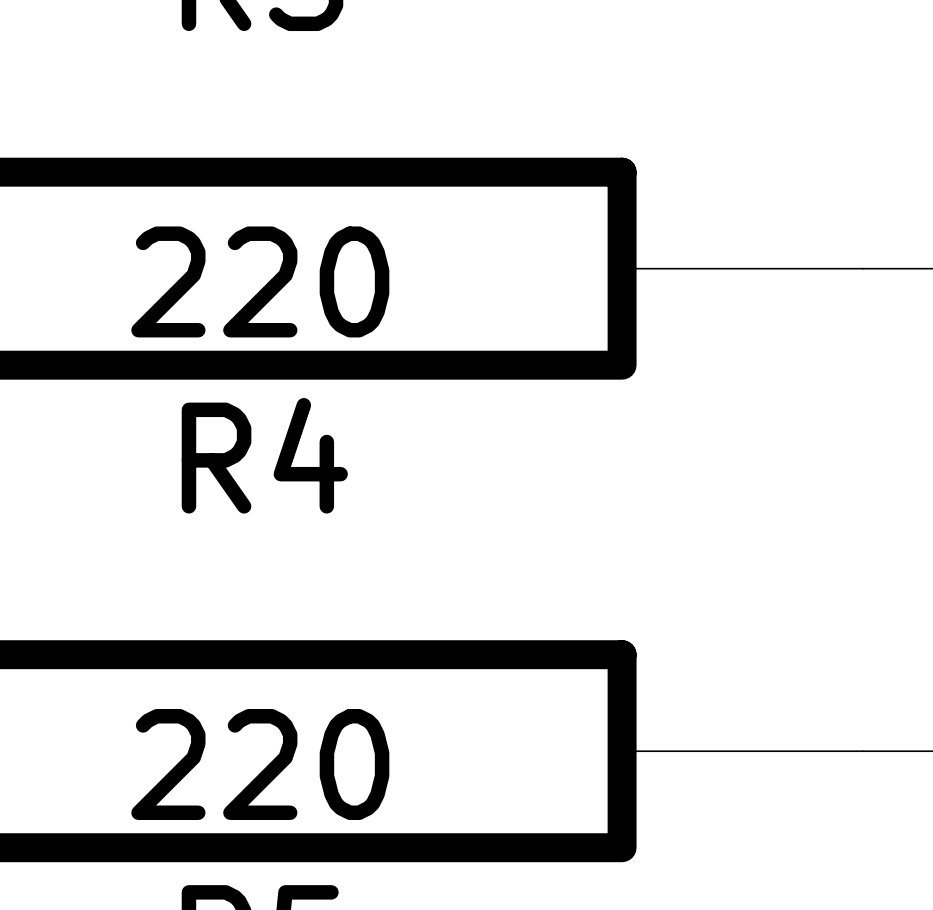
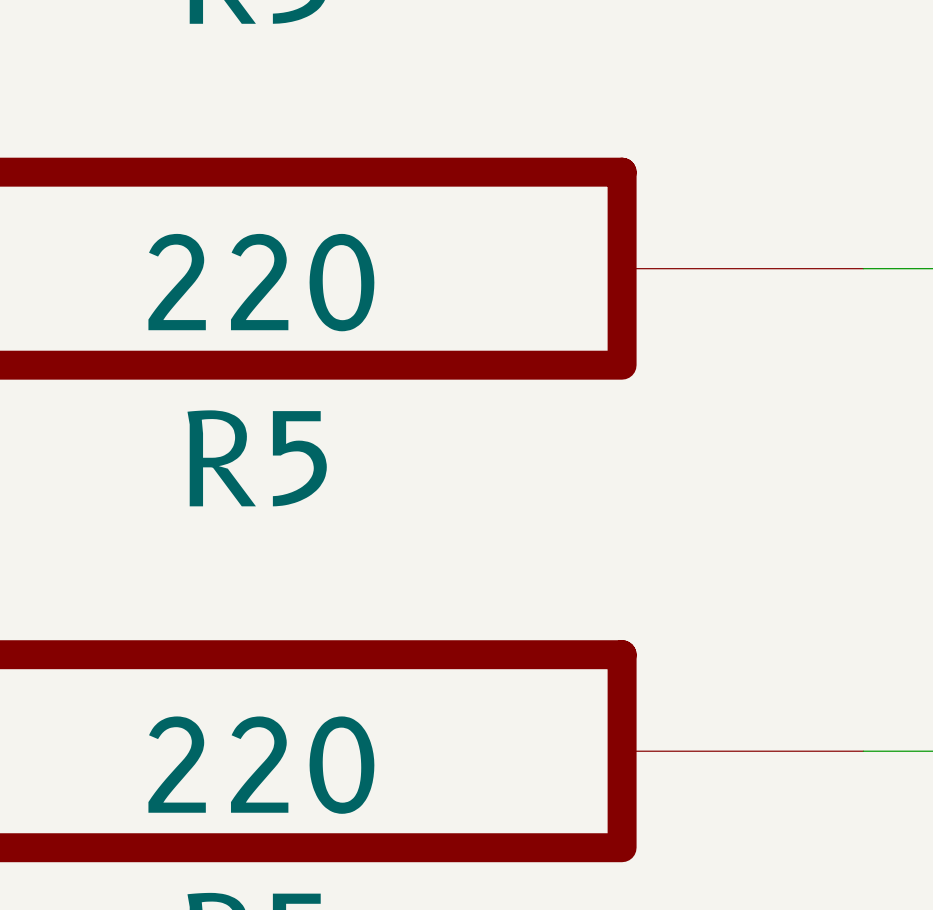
R4 name: R4 (264, 455) -> R5 (257, 458)

